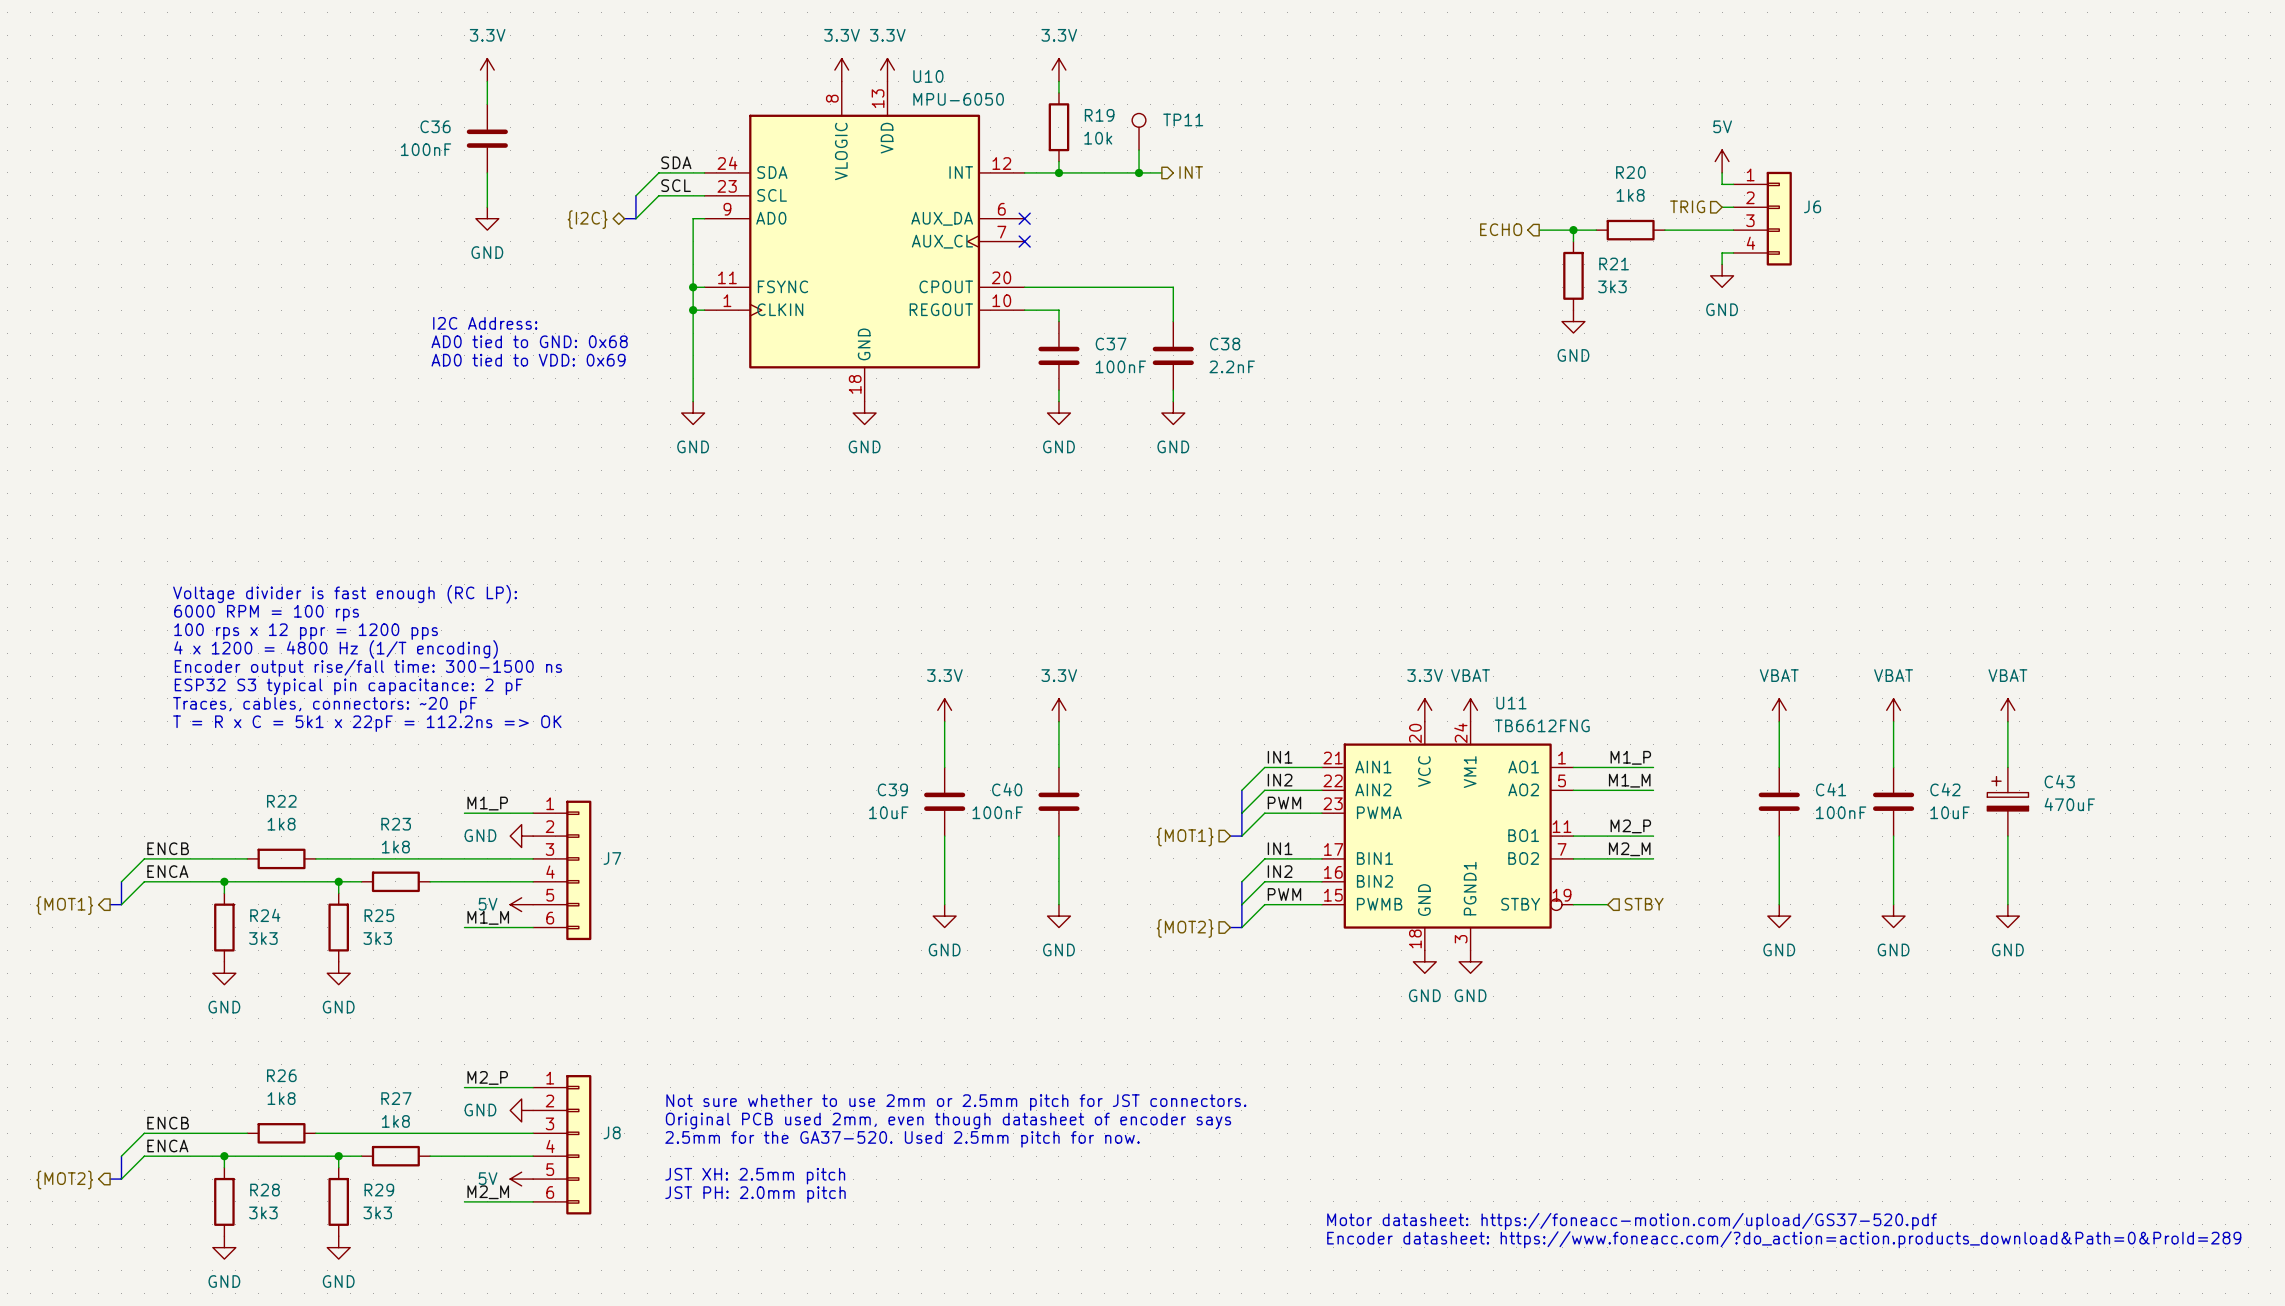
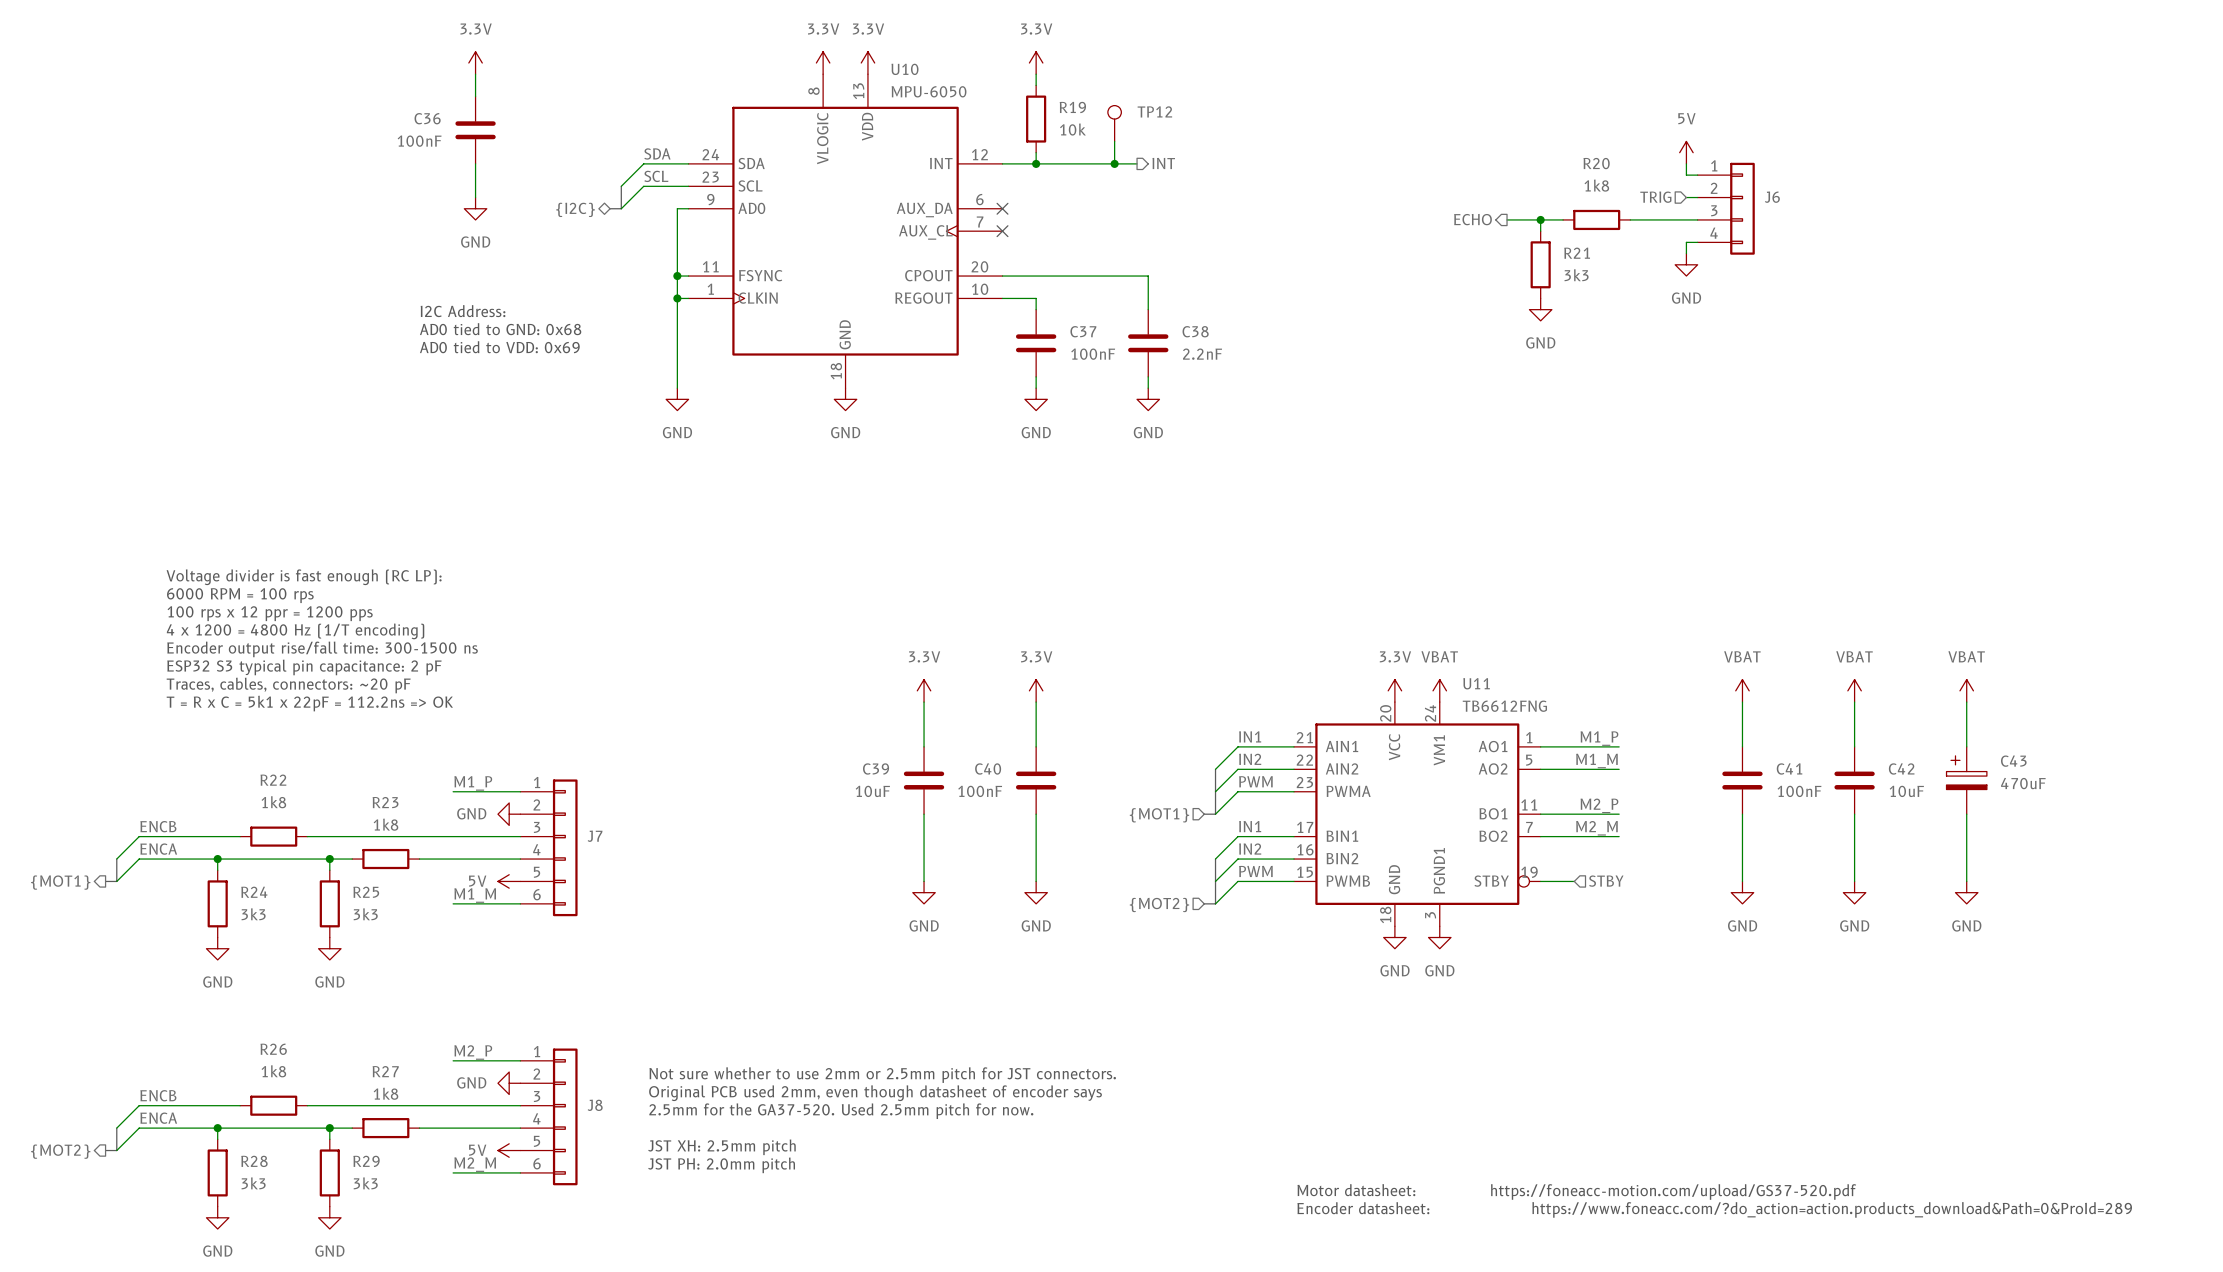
TP11 name: TP11 (1183, 119) -> TP12 (1154, 111)

